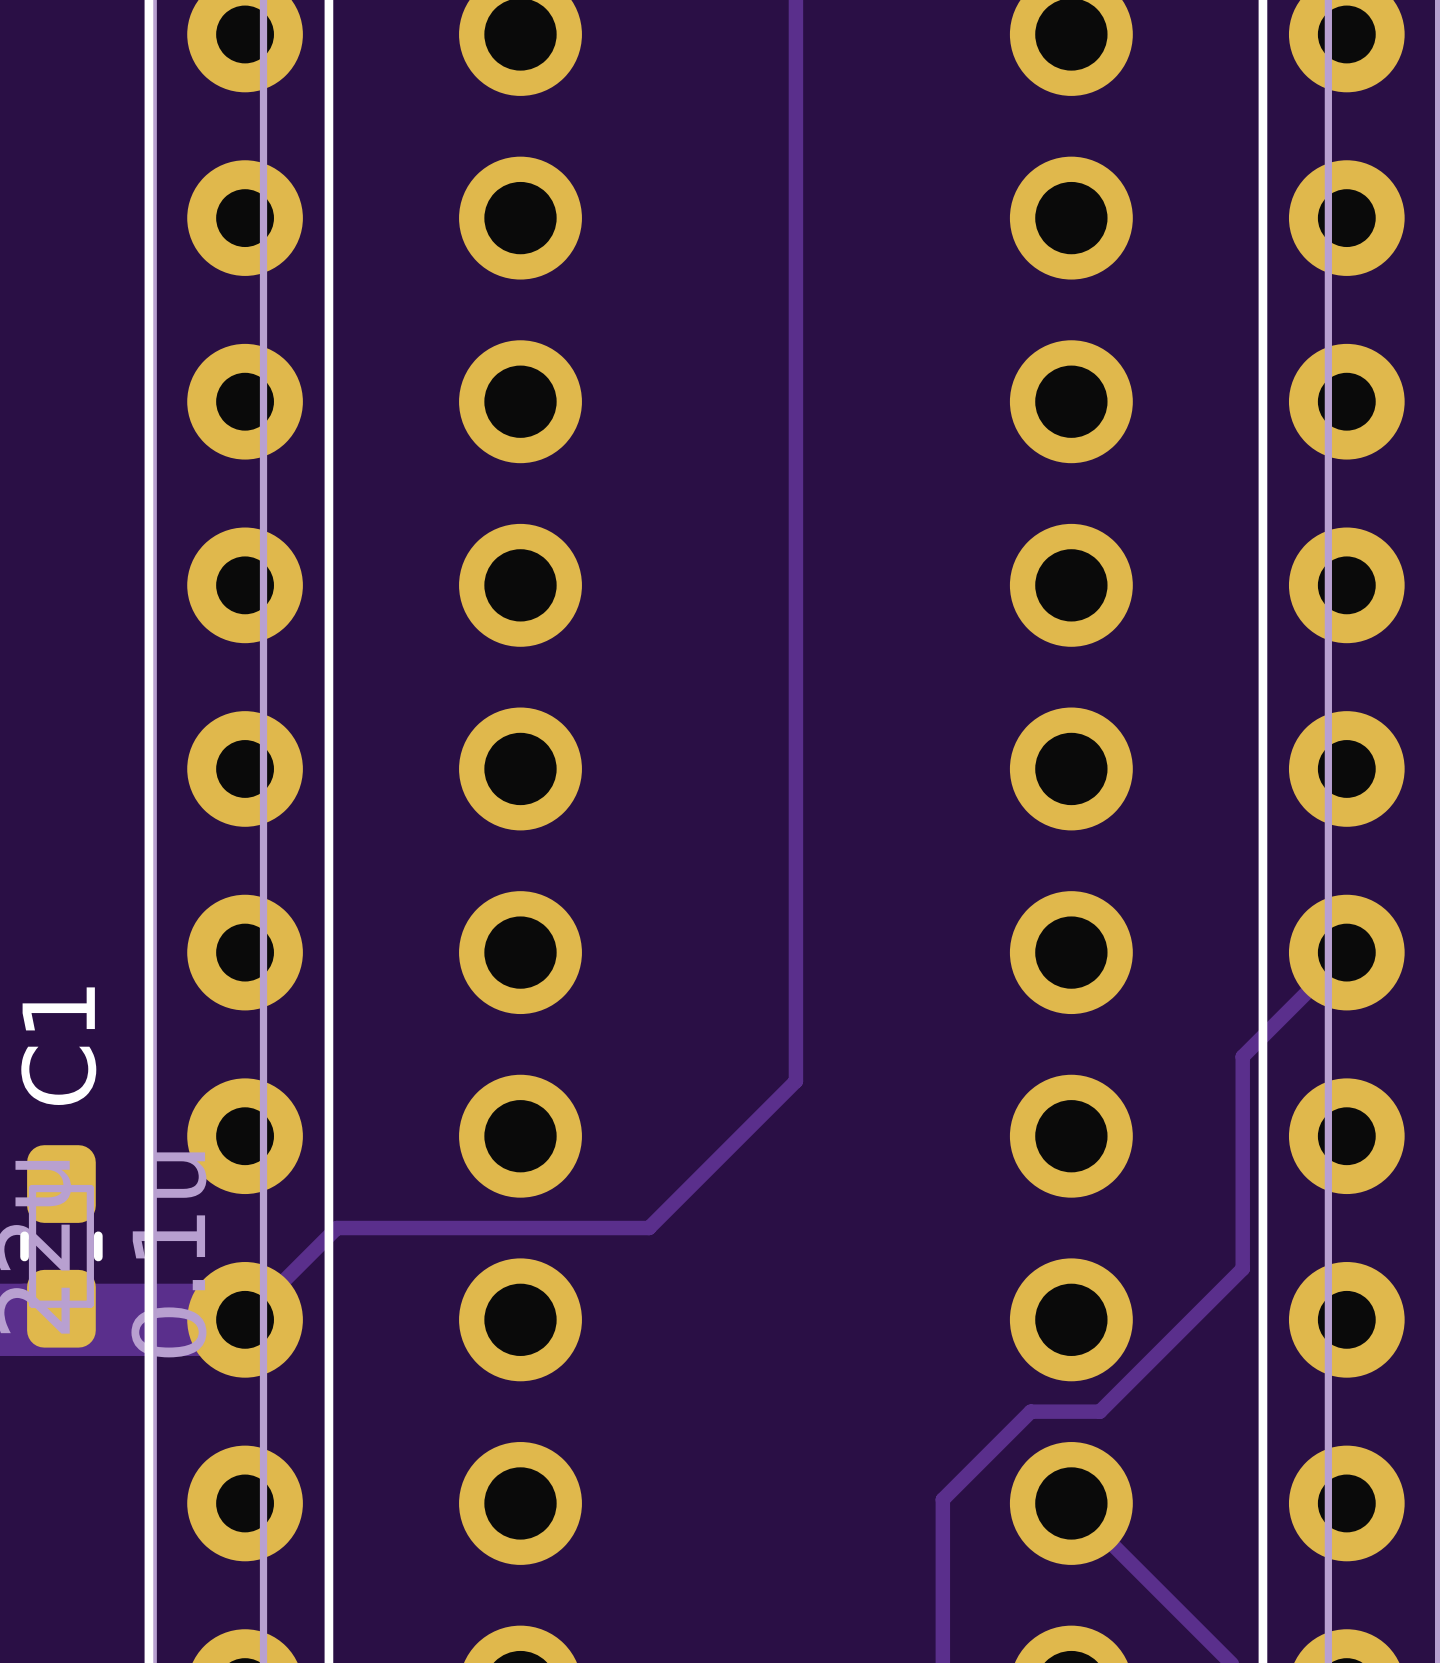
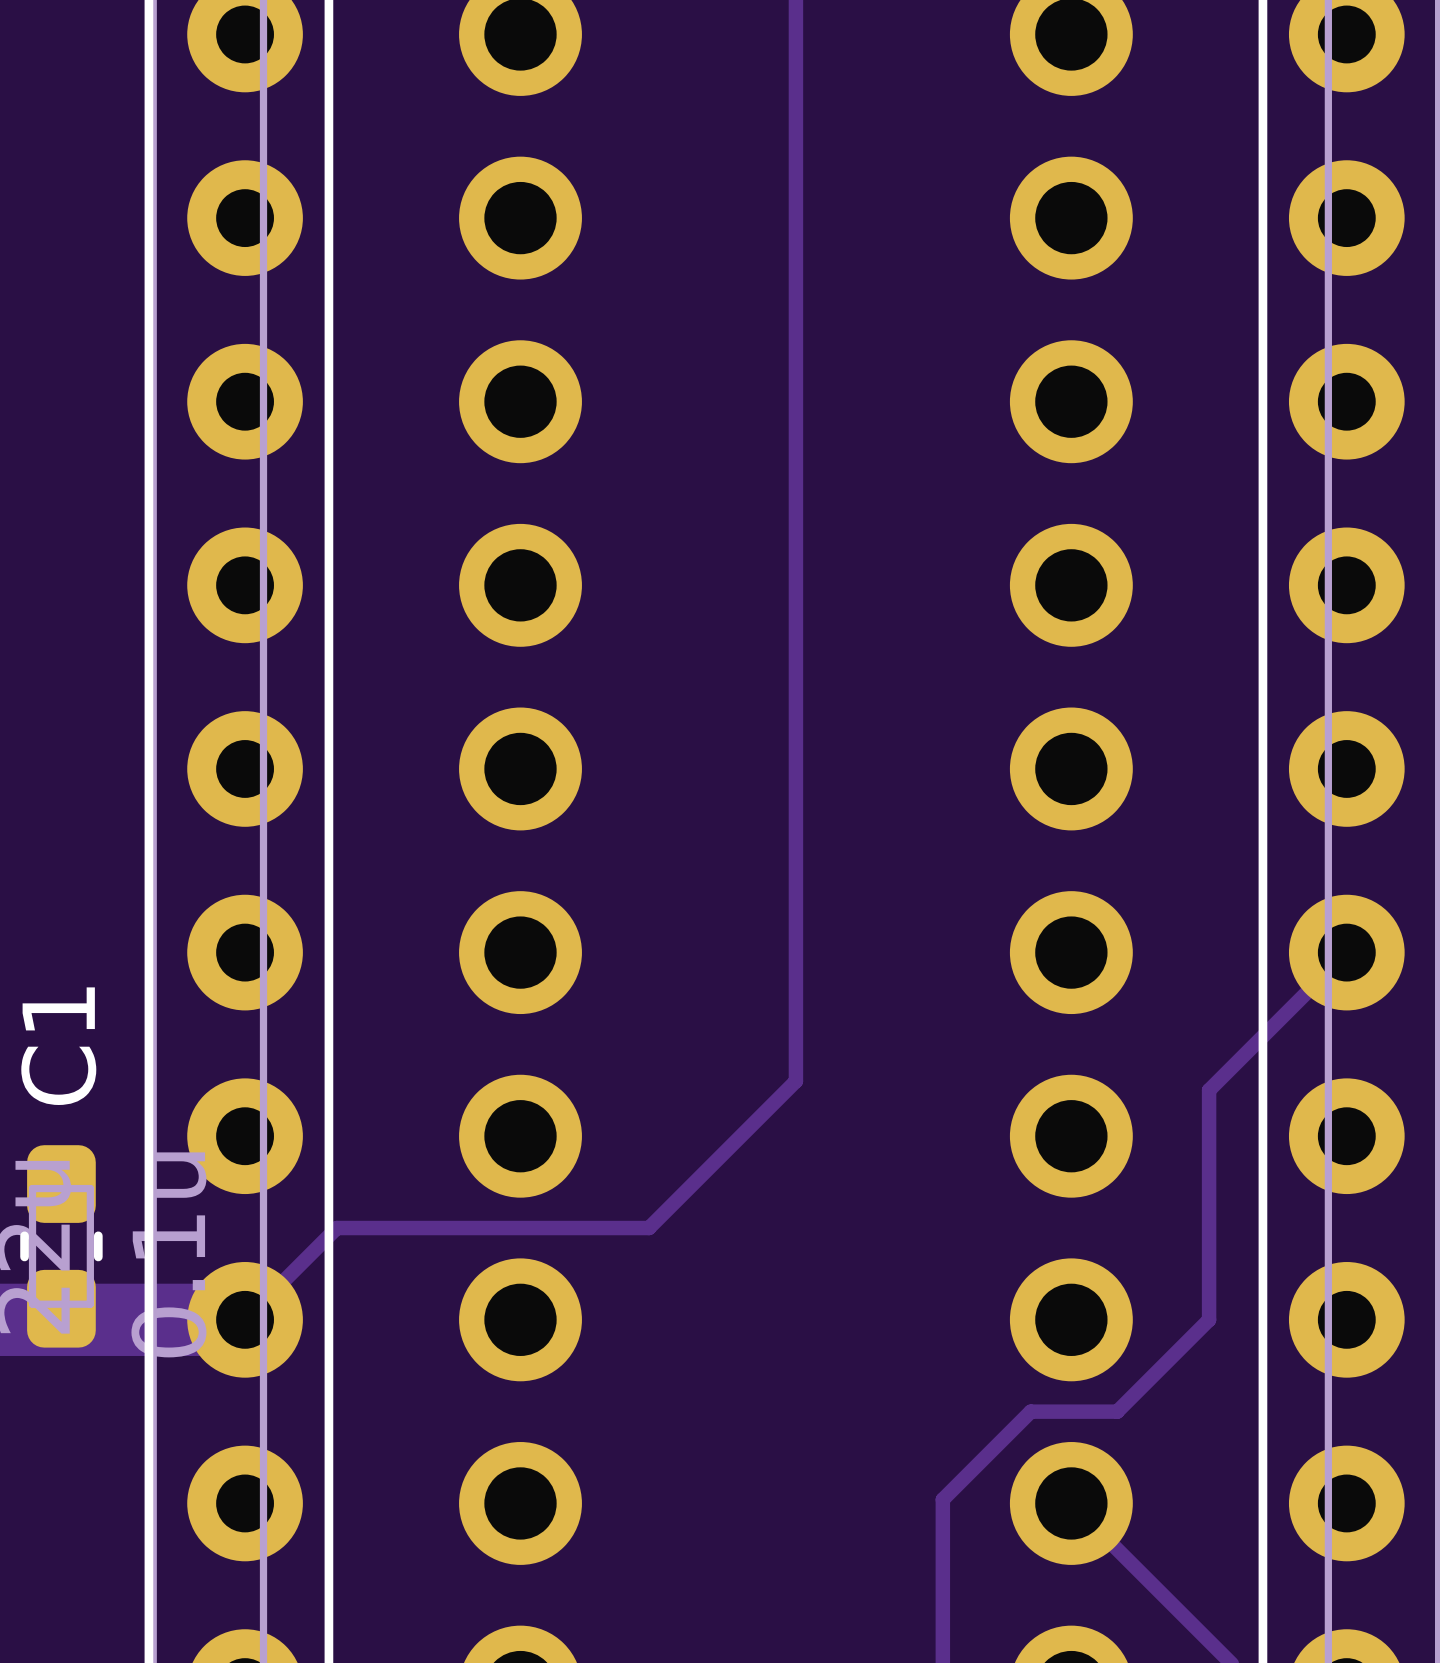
track: (1242, 1056) (1242, 1268) (1099, 1411) -> (1242, 1056) (1209, 1090) (1209, 1319) (1117, 1411) (1099, 1411)

